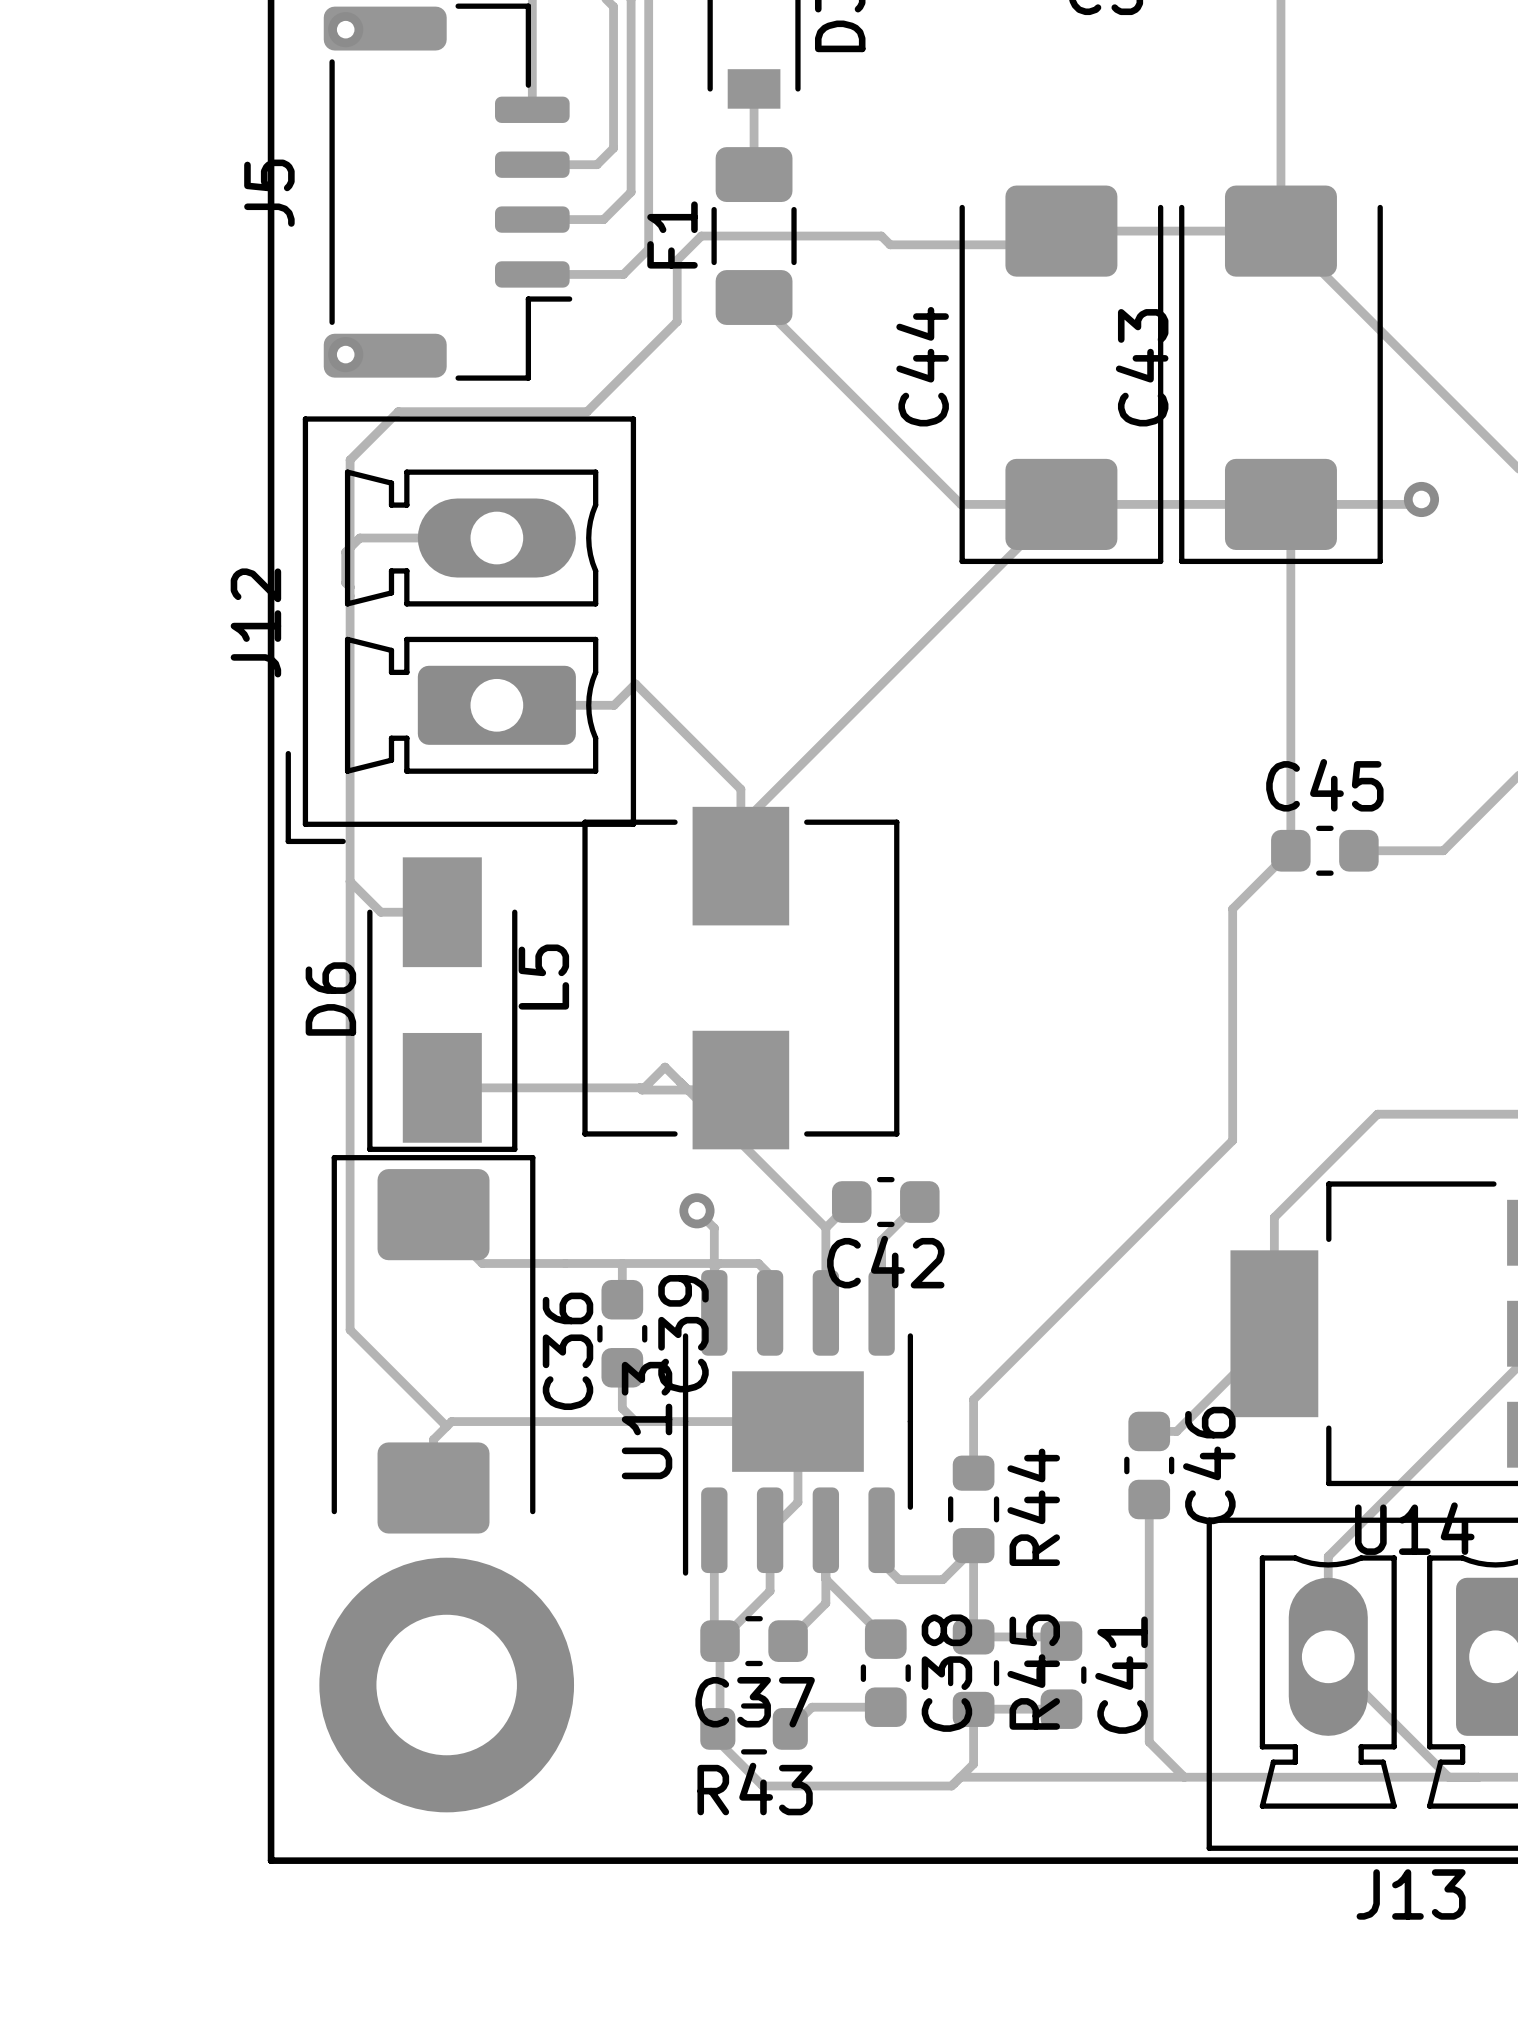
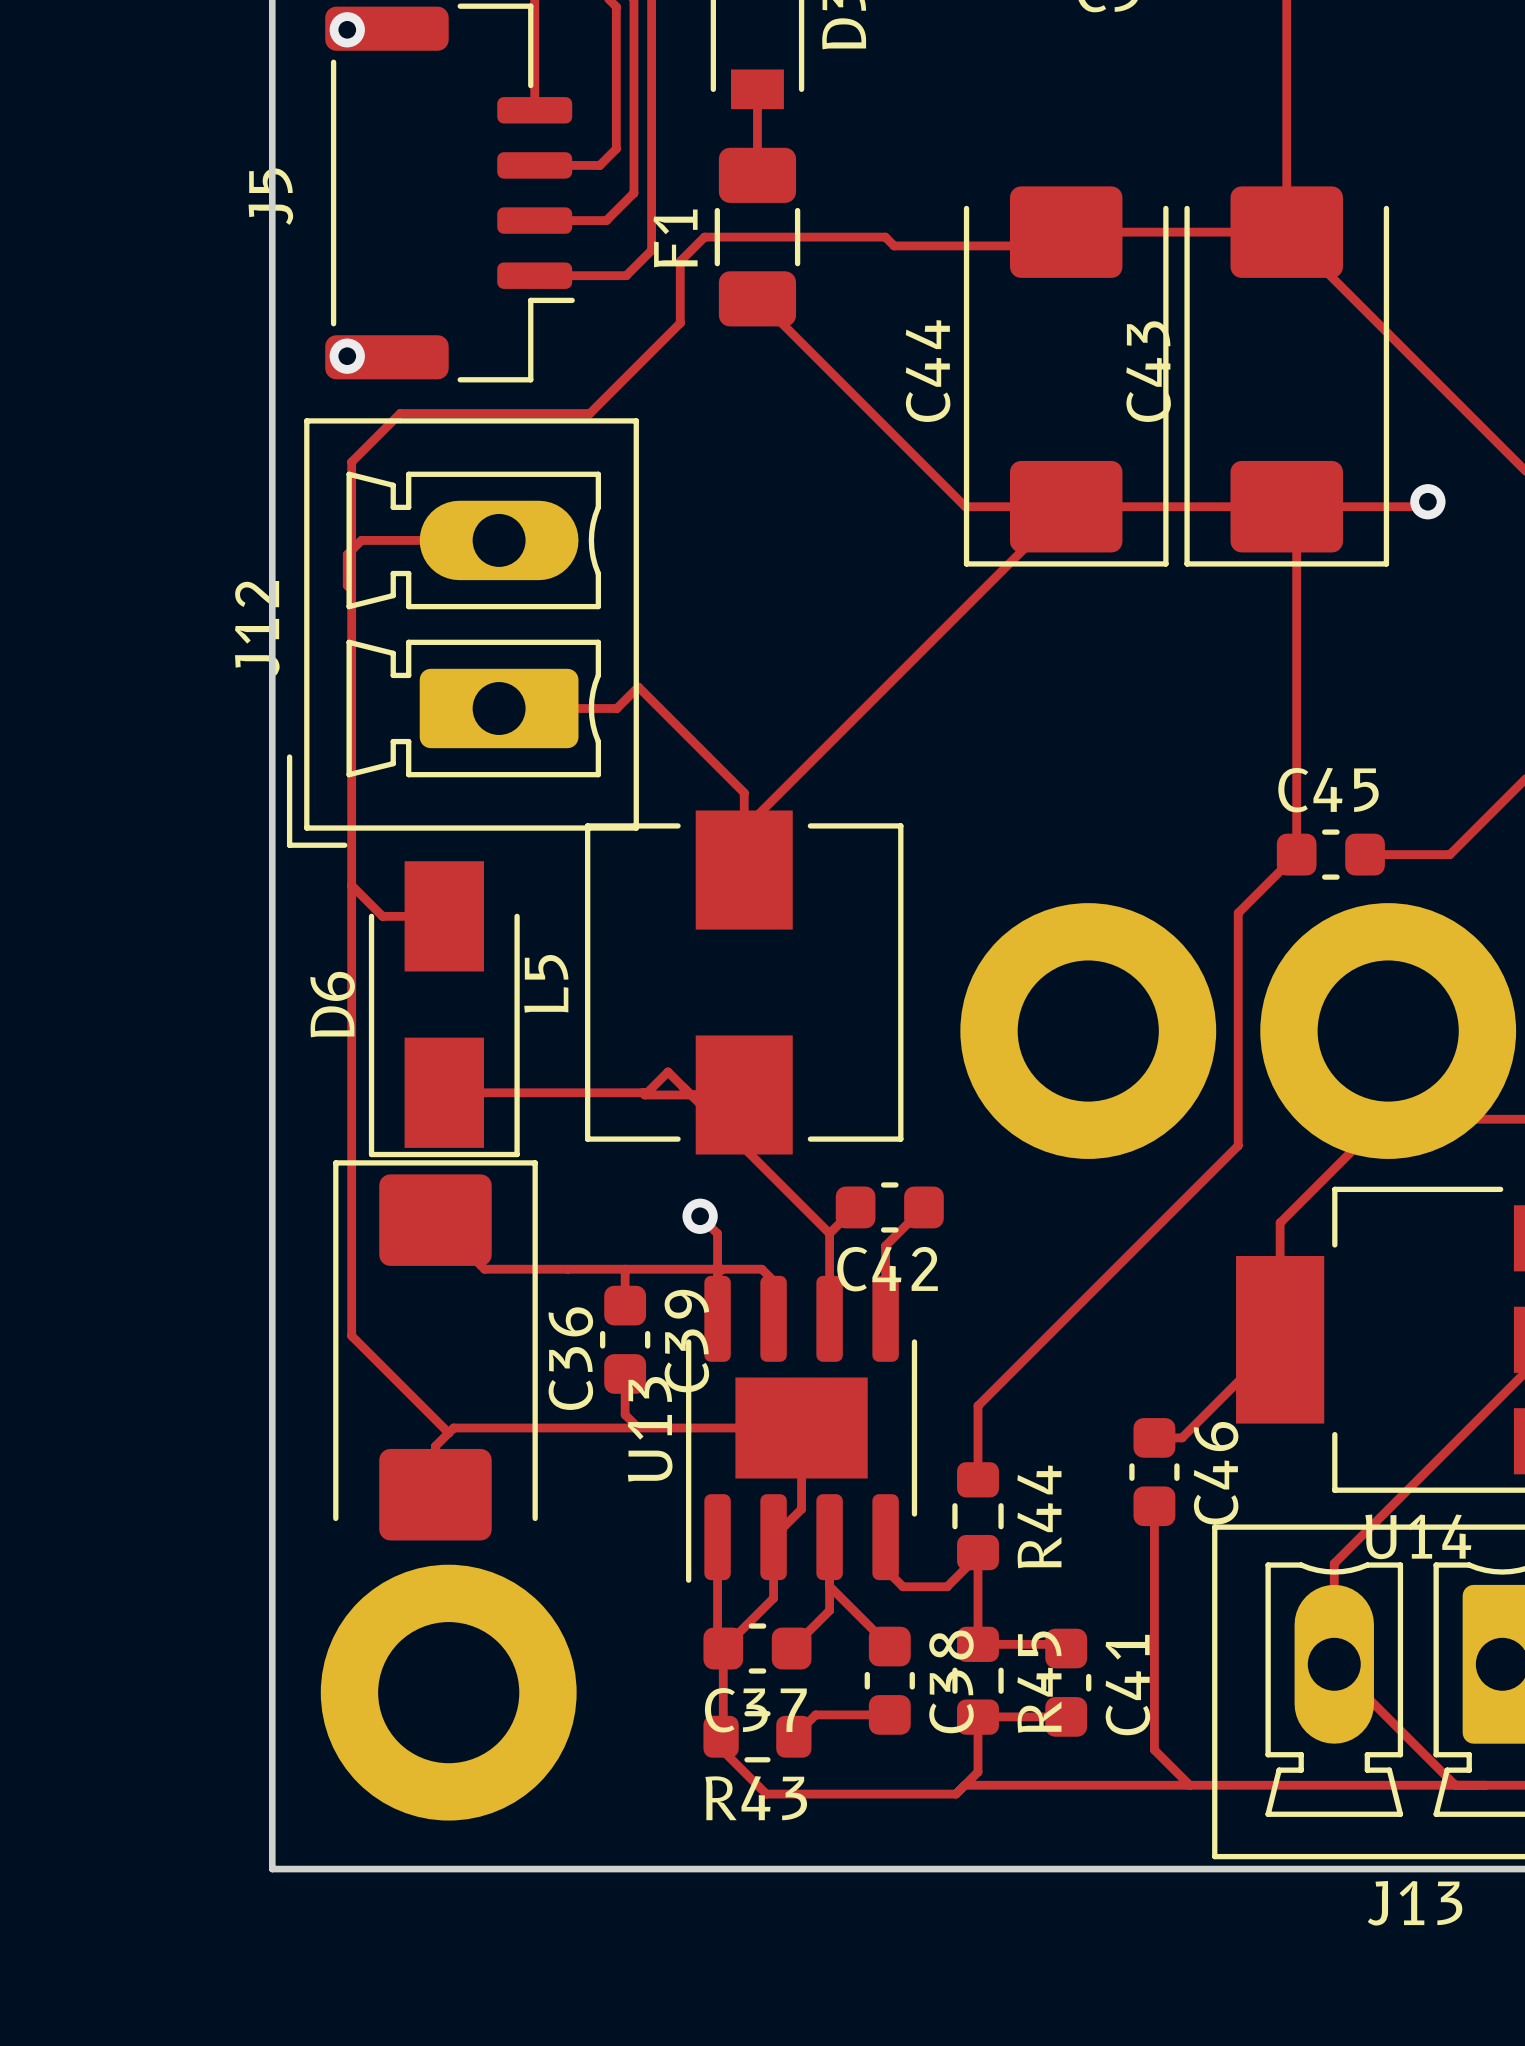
part: none -> (1088, 1031)
part: none -> (1388, 1031)

